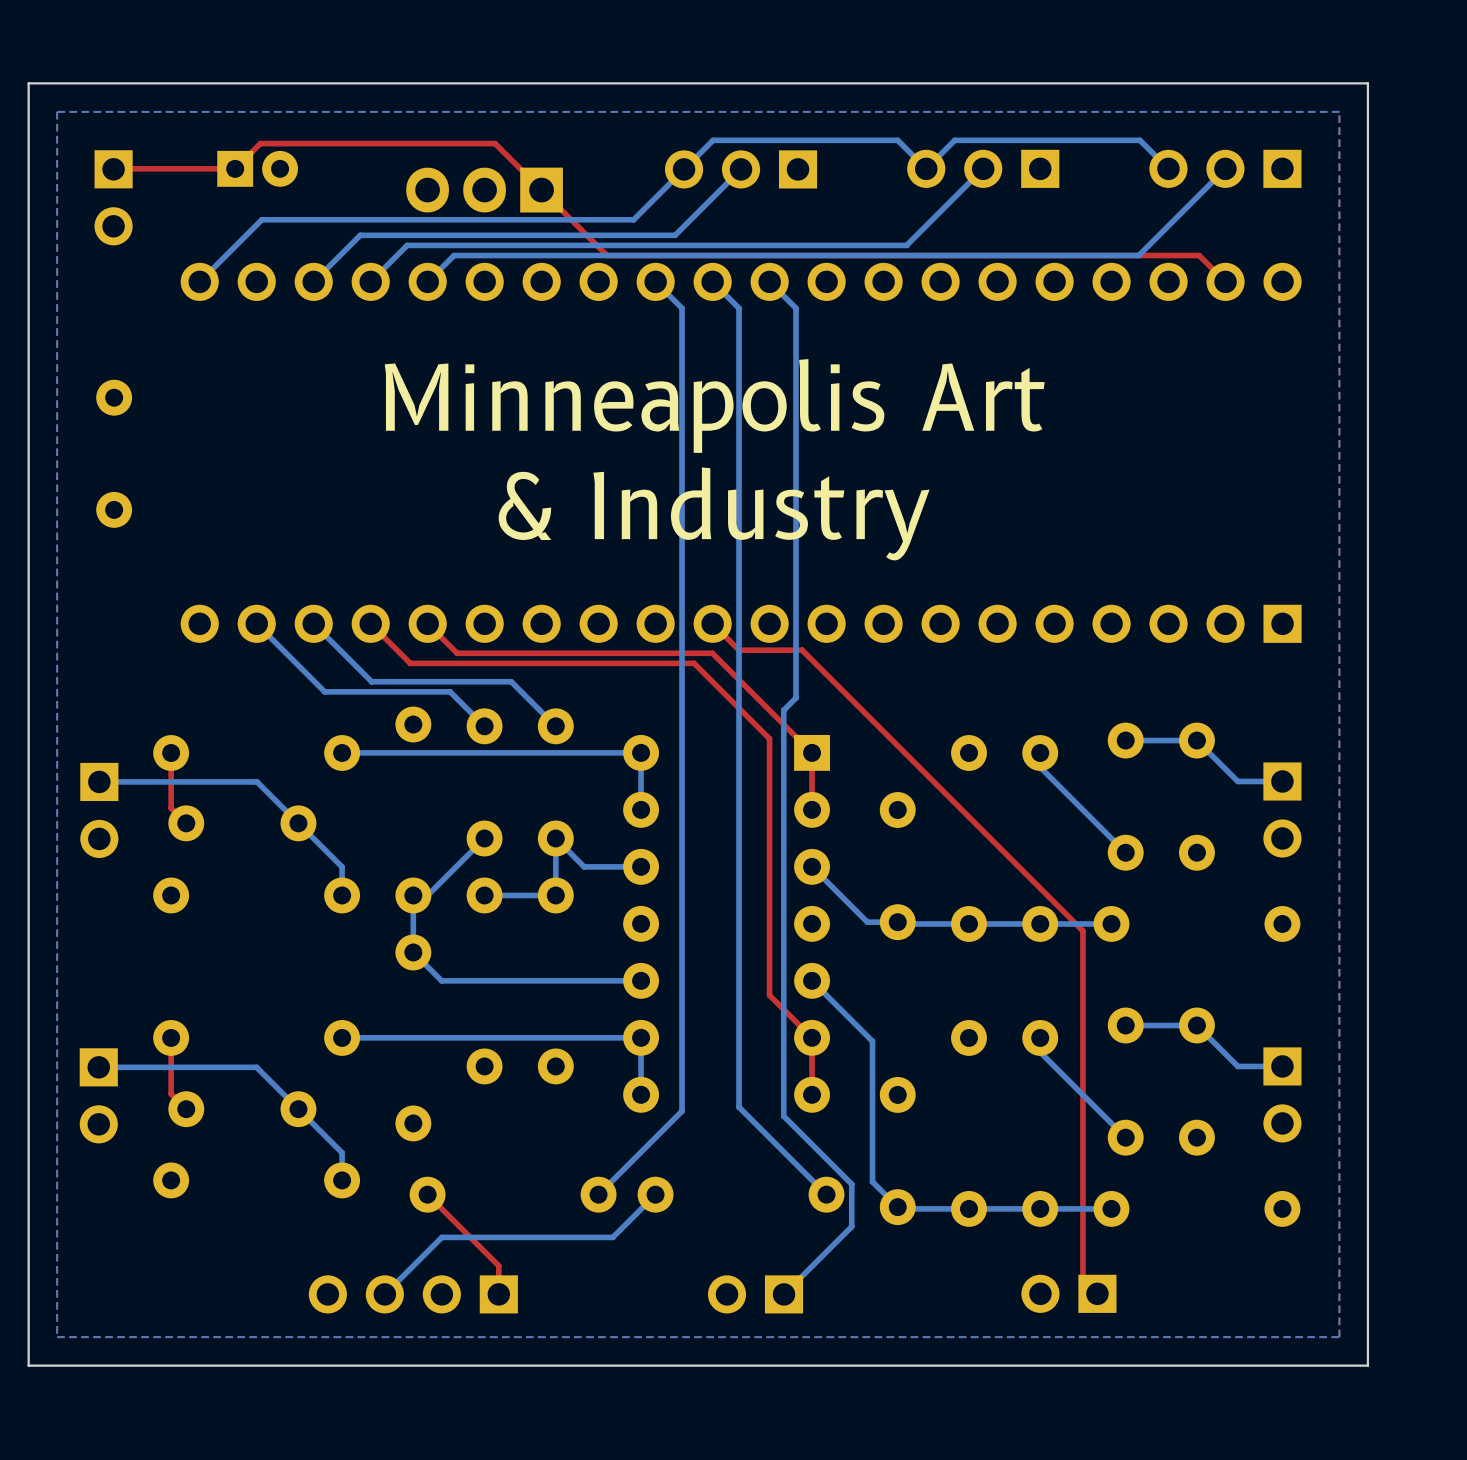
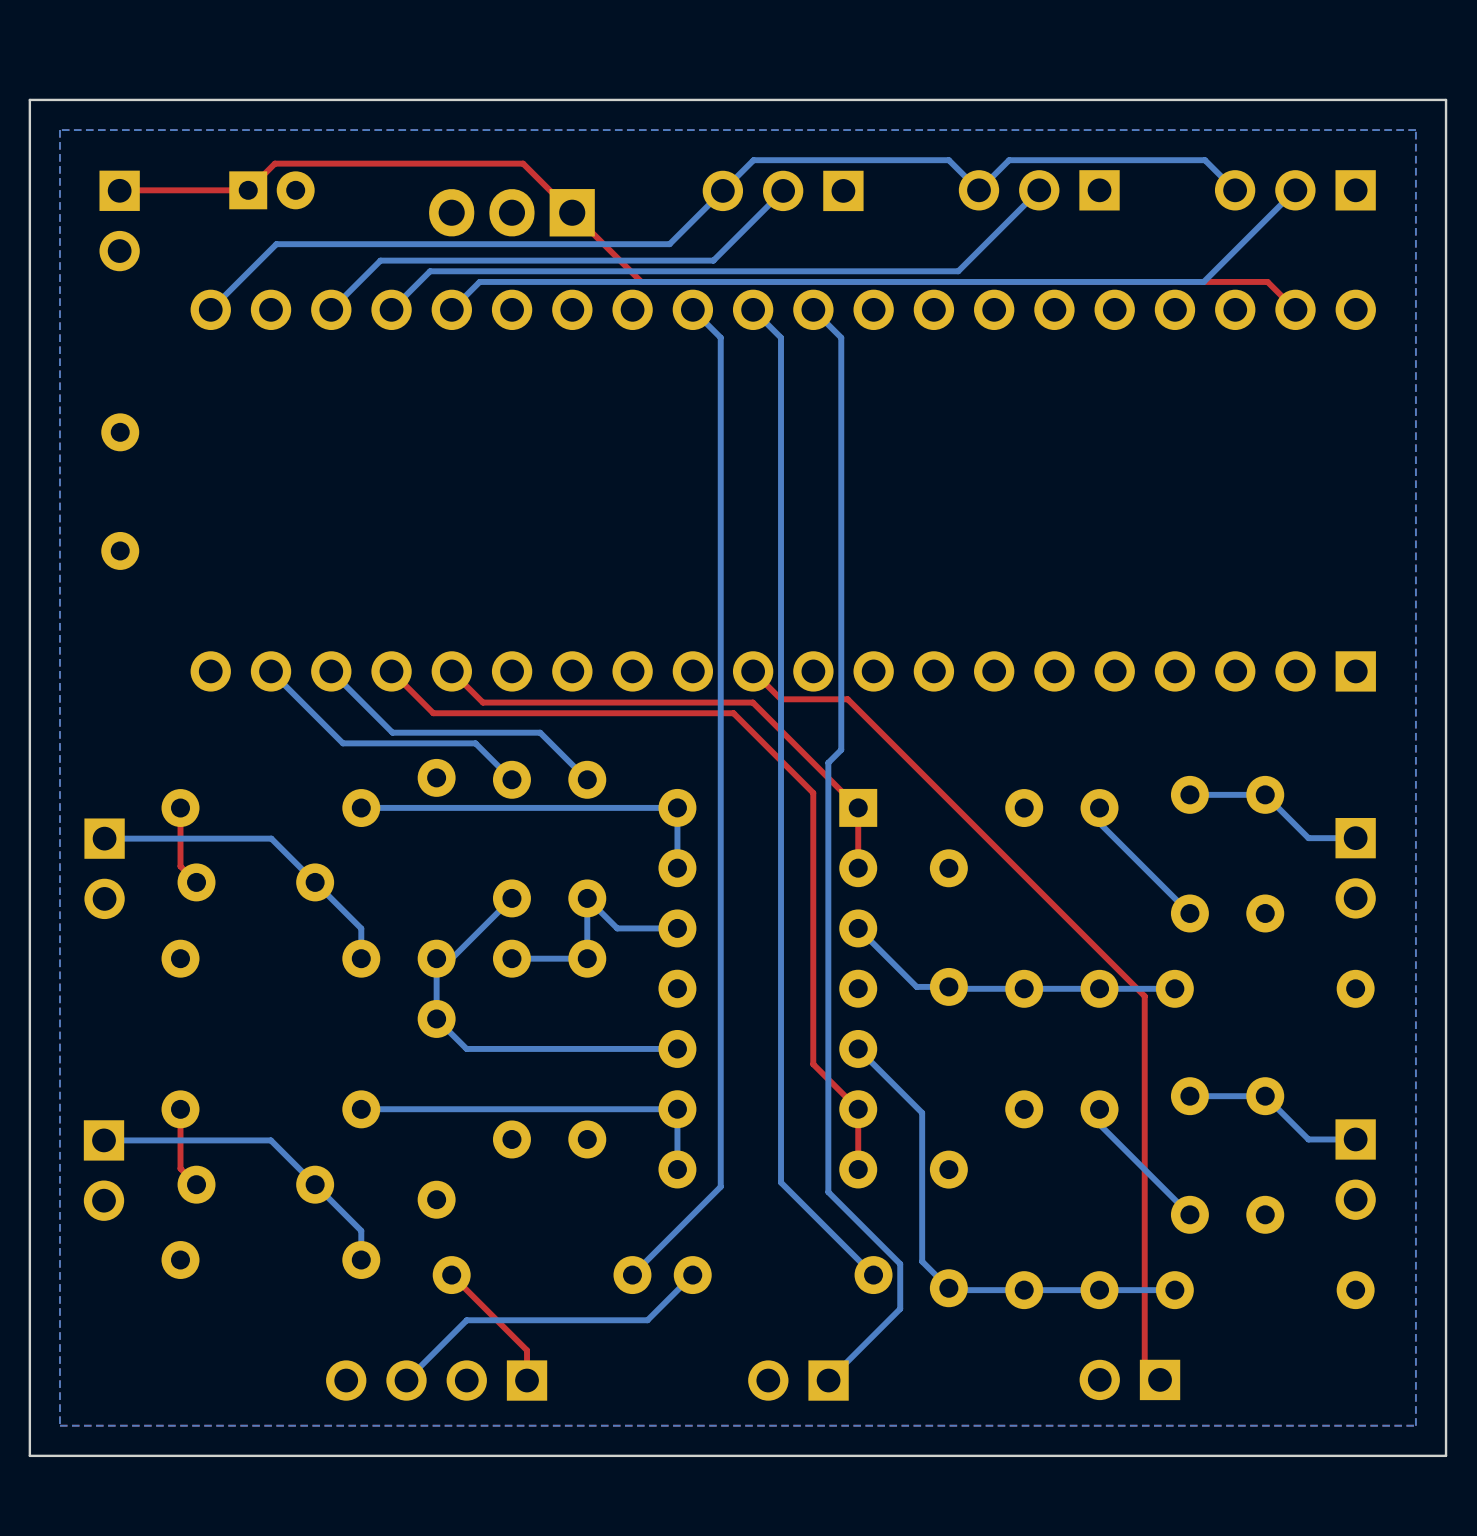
text: Minneapolis Art (714, 405) -> none
text: & Industry (714, 513) -> none

